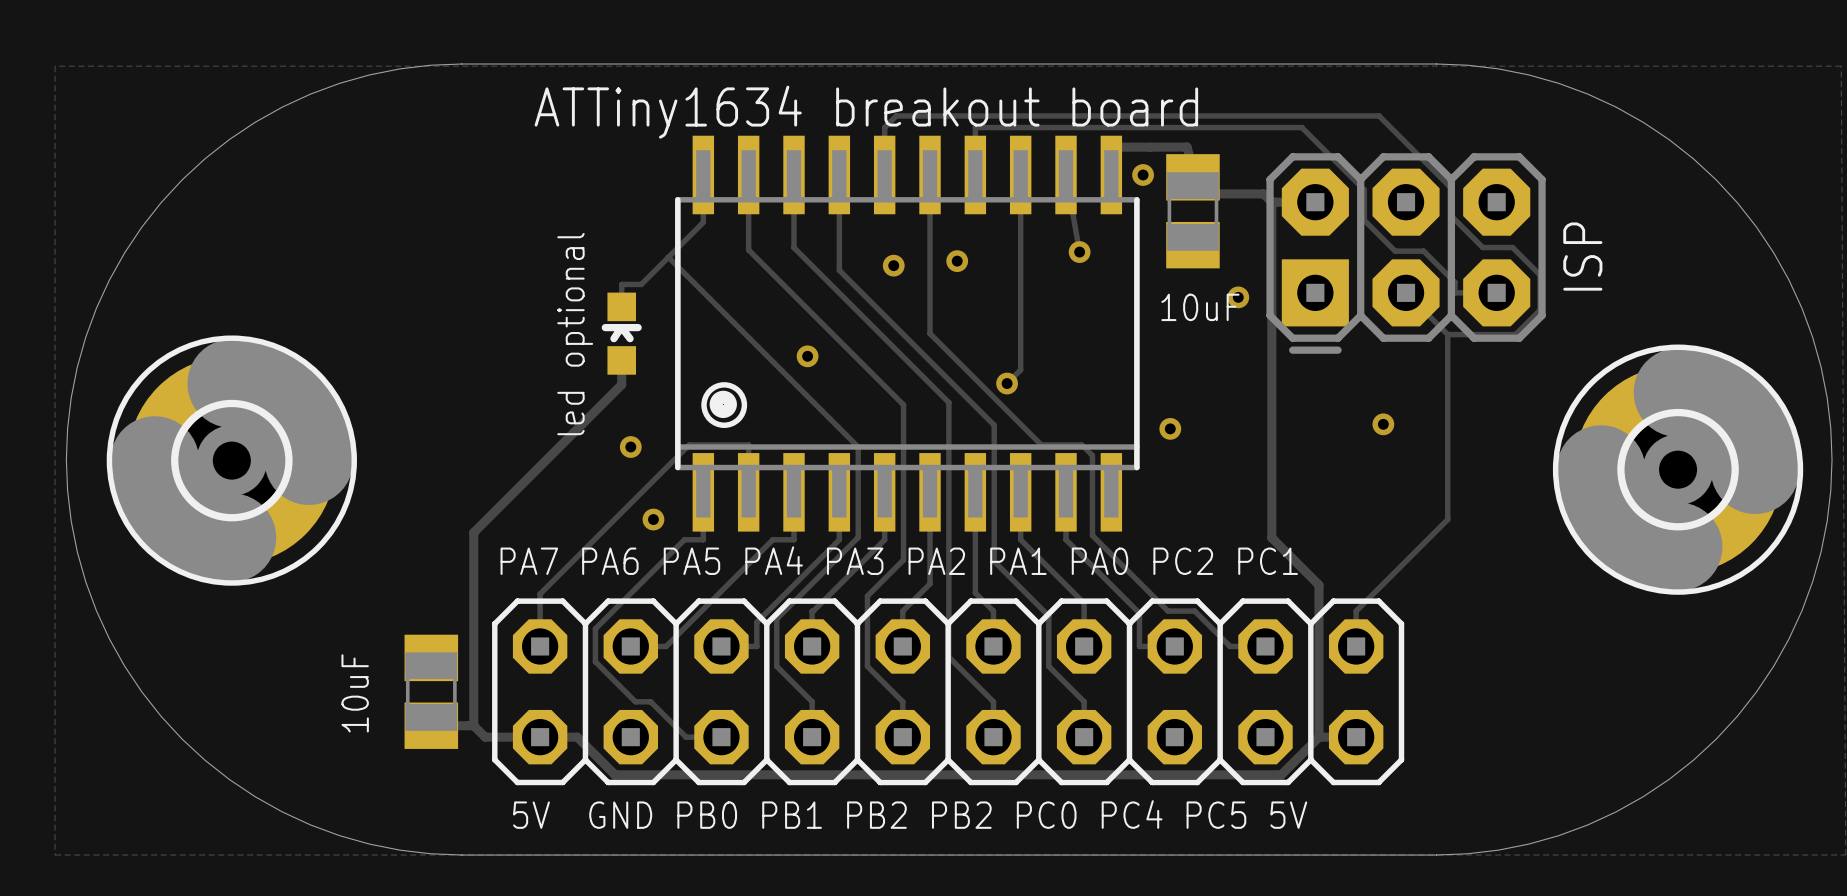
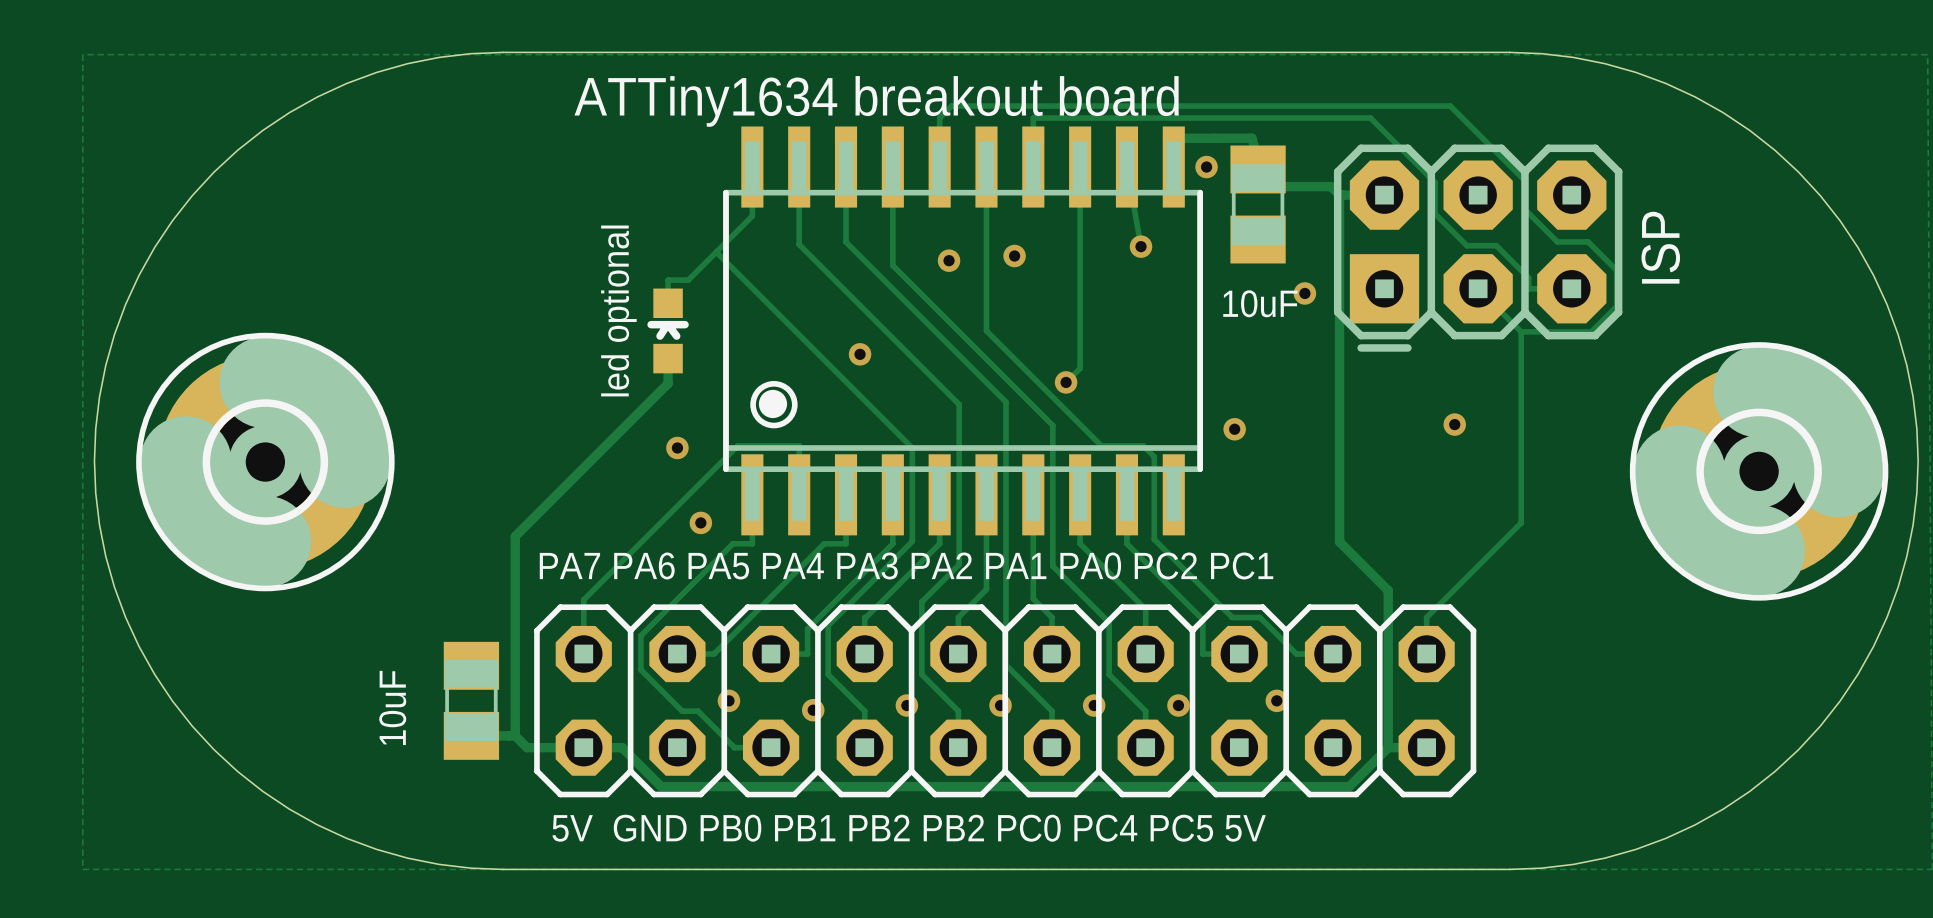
via: none -> (728, 700)
via: none -> (1276, 700)
via: none -> (906, 705)
via: none -> (1000, 705)
via: none -> (1094, 705)
via: none -> (1178, 705)
via: none -> (813, 710)

